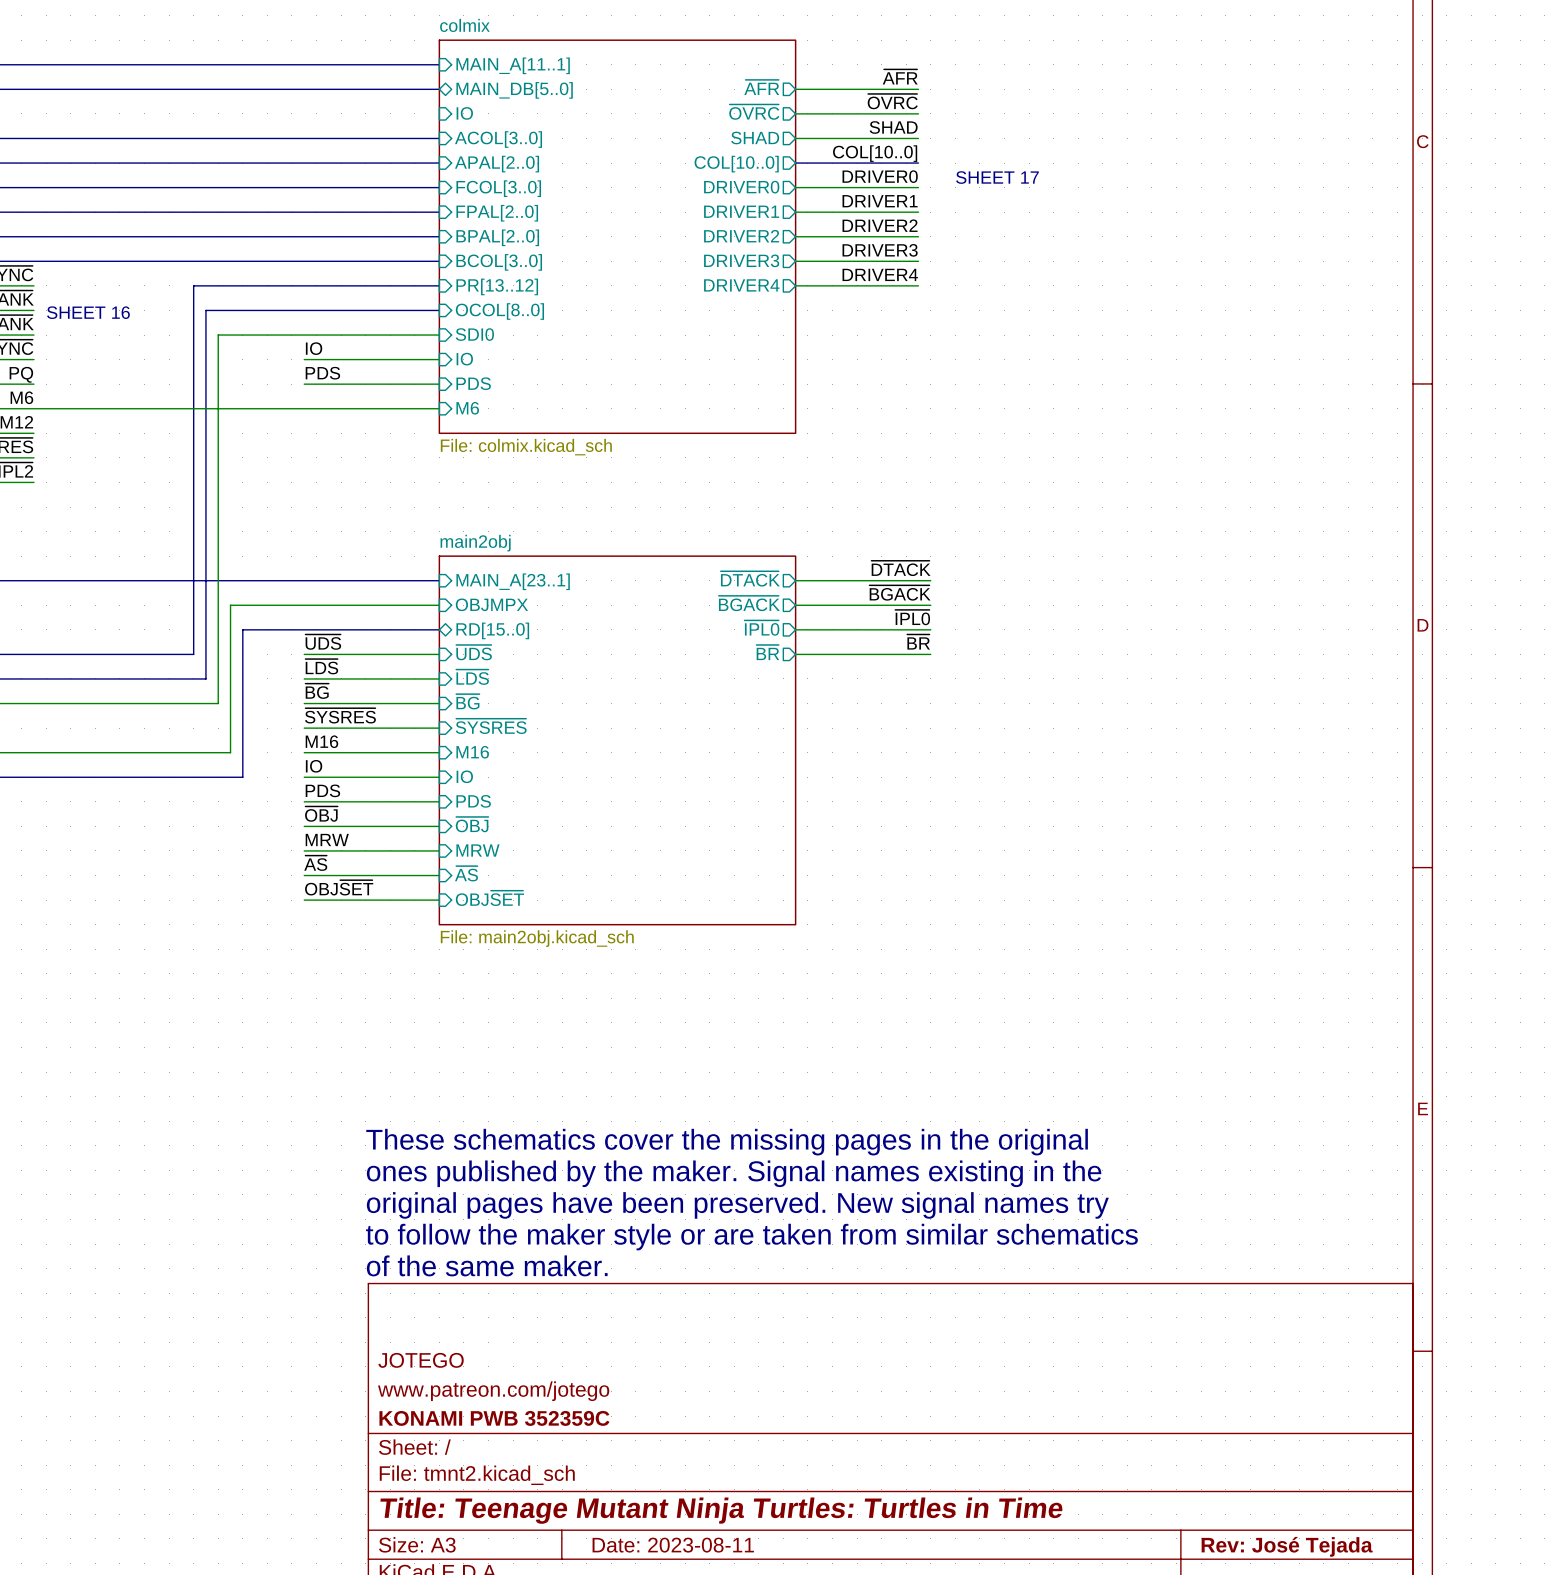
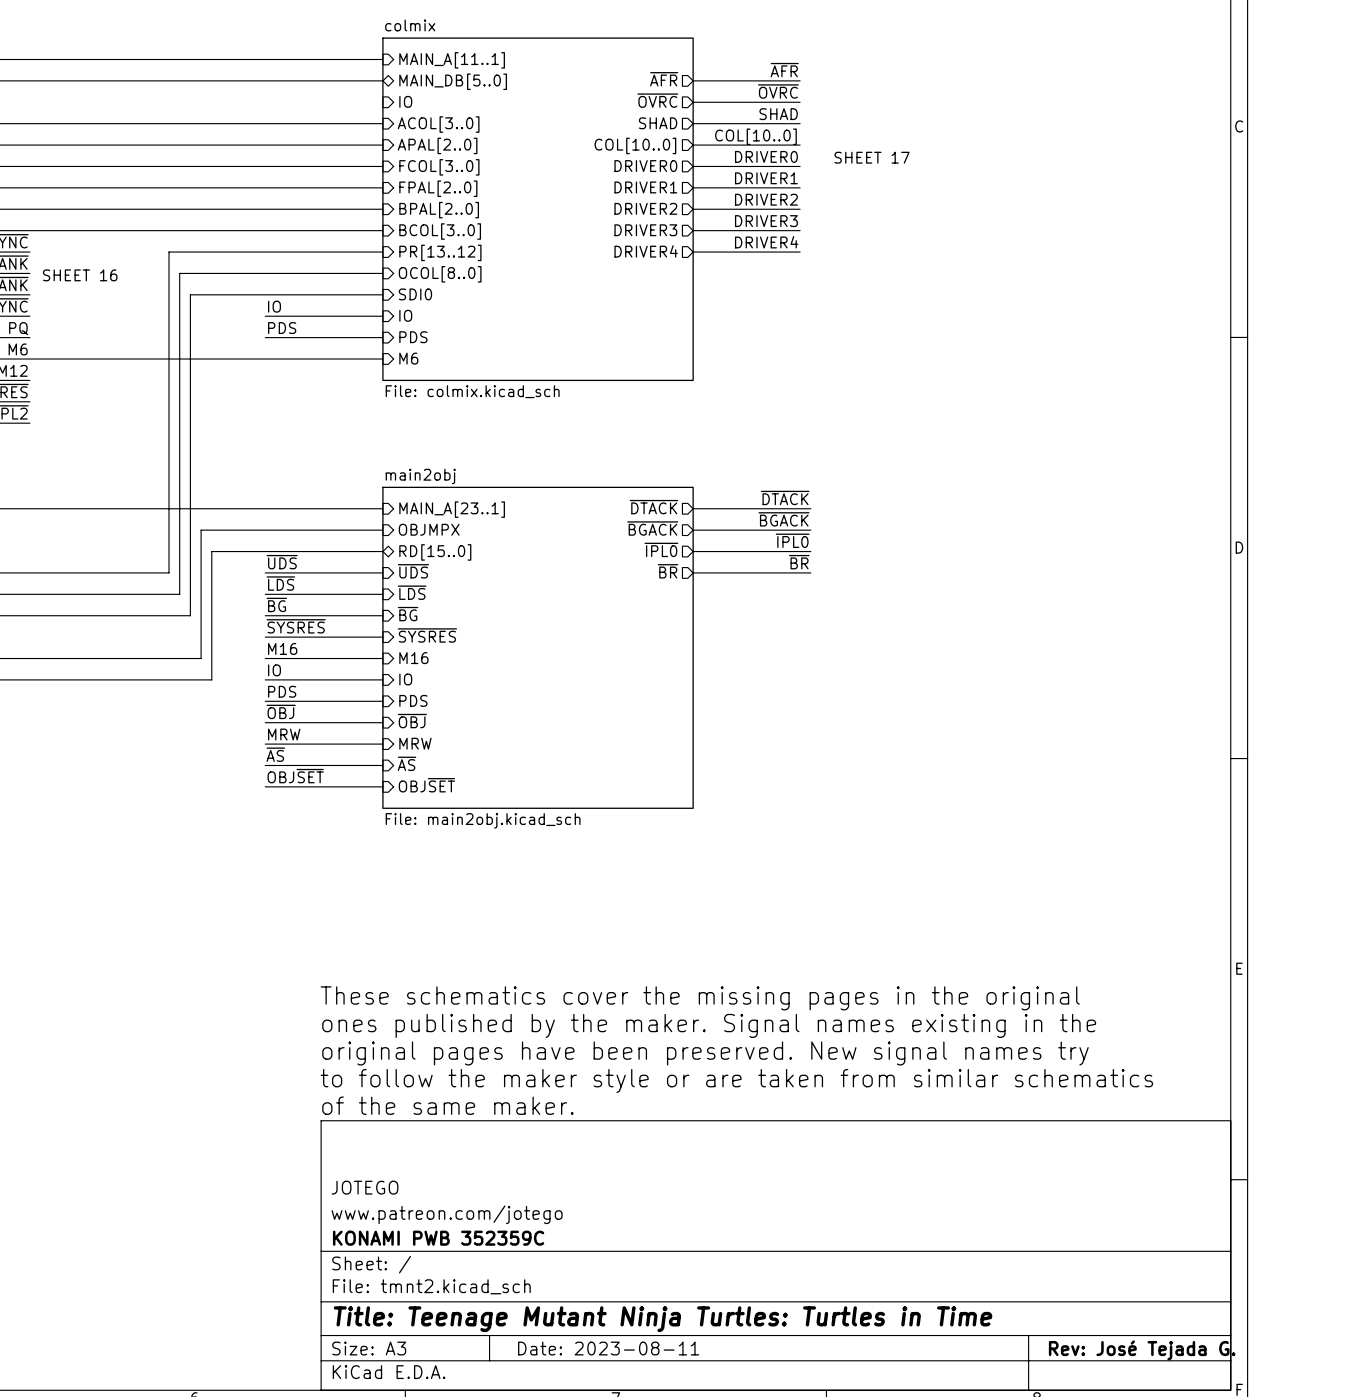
title block: Rev: José Tejada (1287, 1546) -> Rev: José Tejada G. (1142, 1350)

